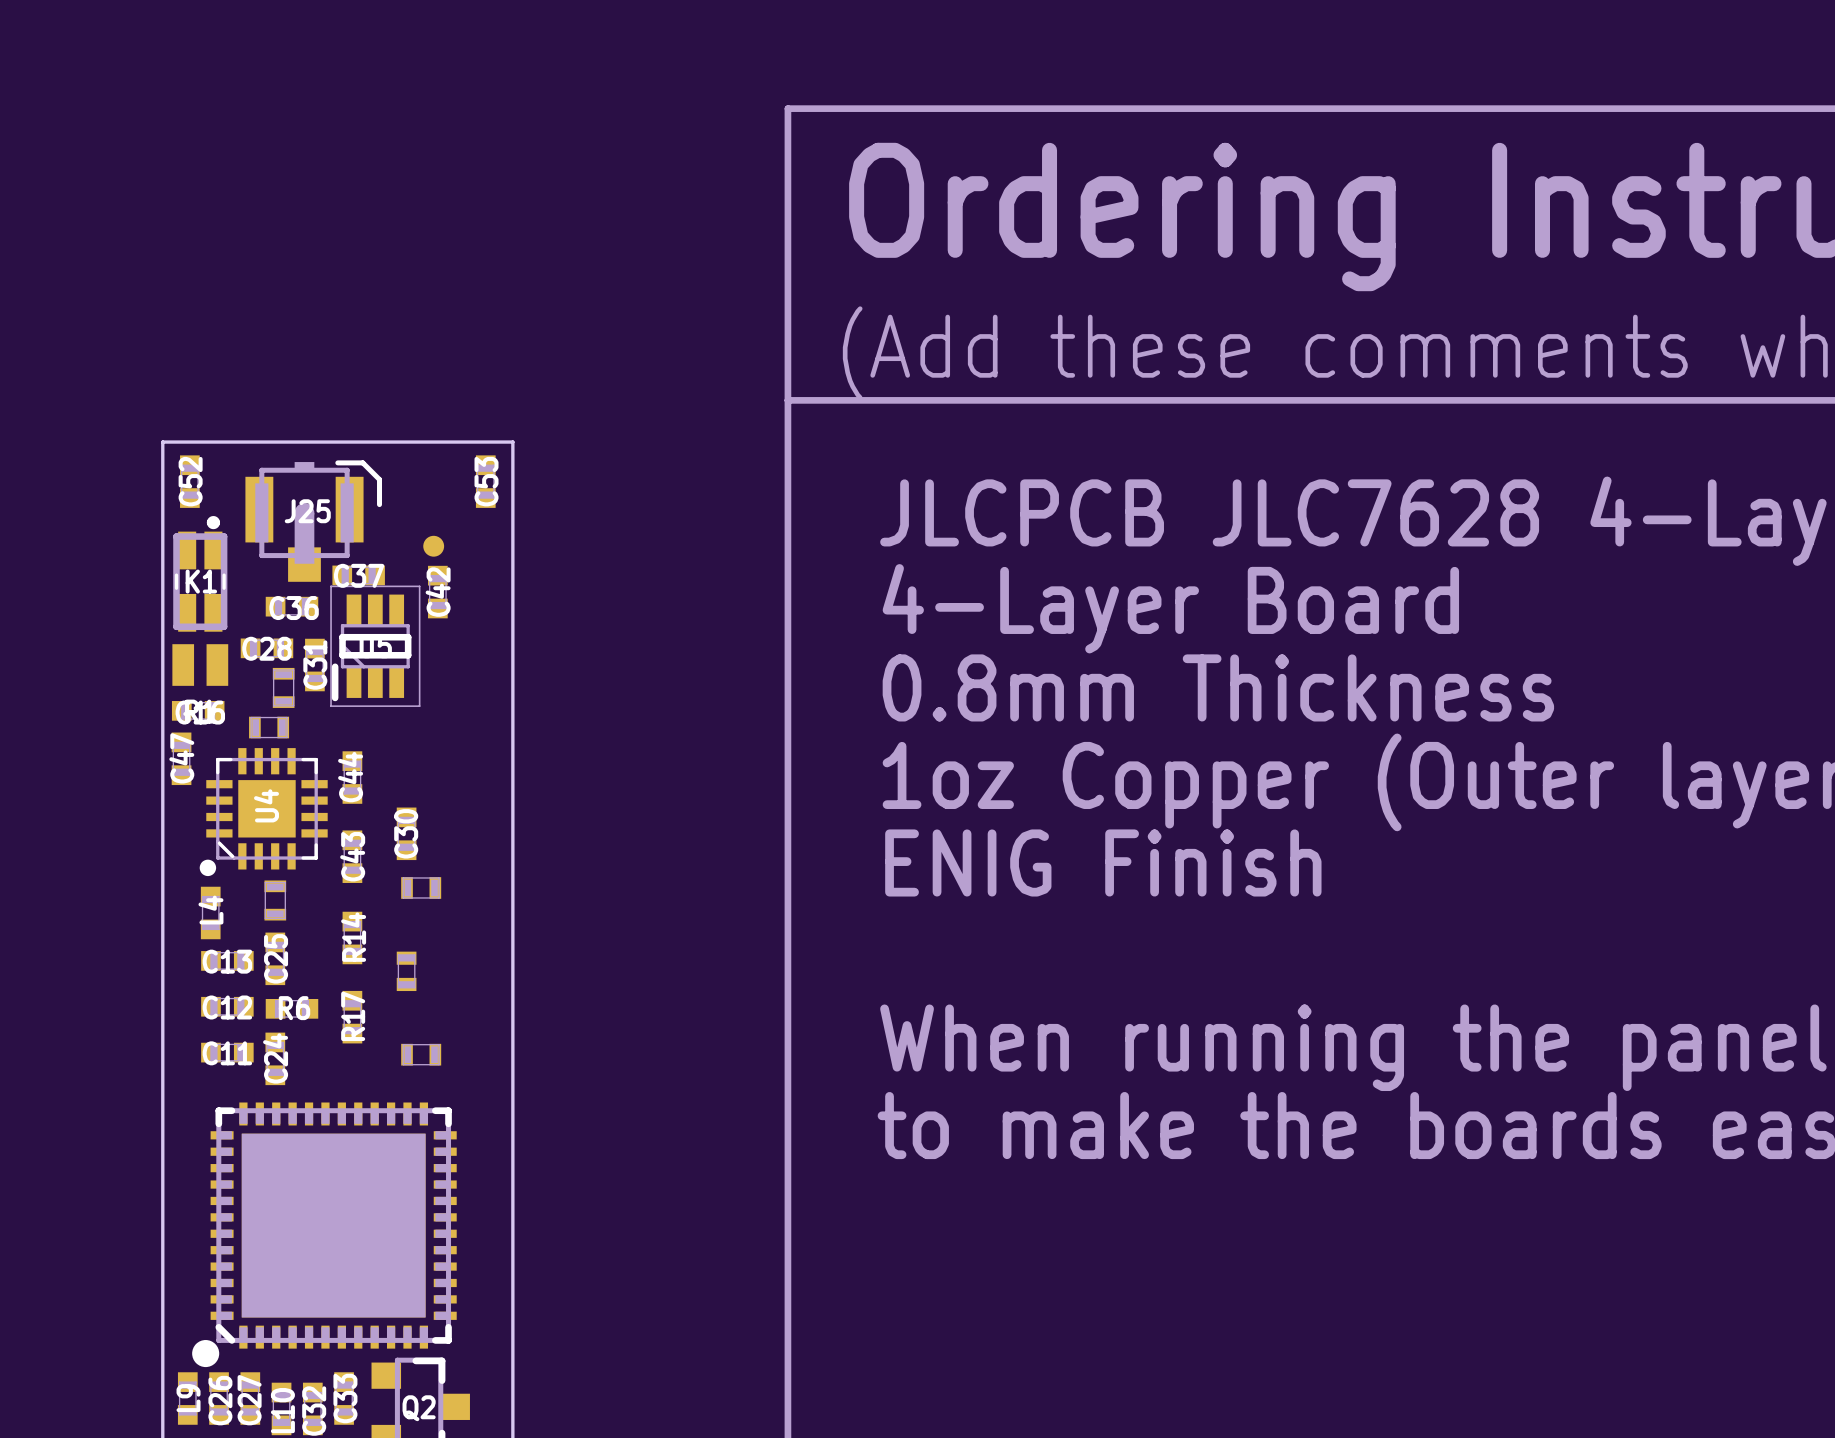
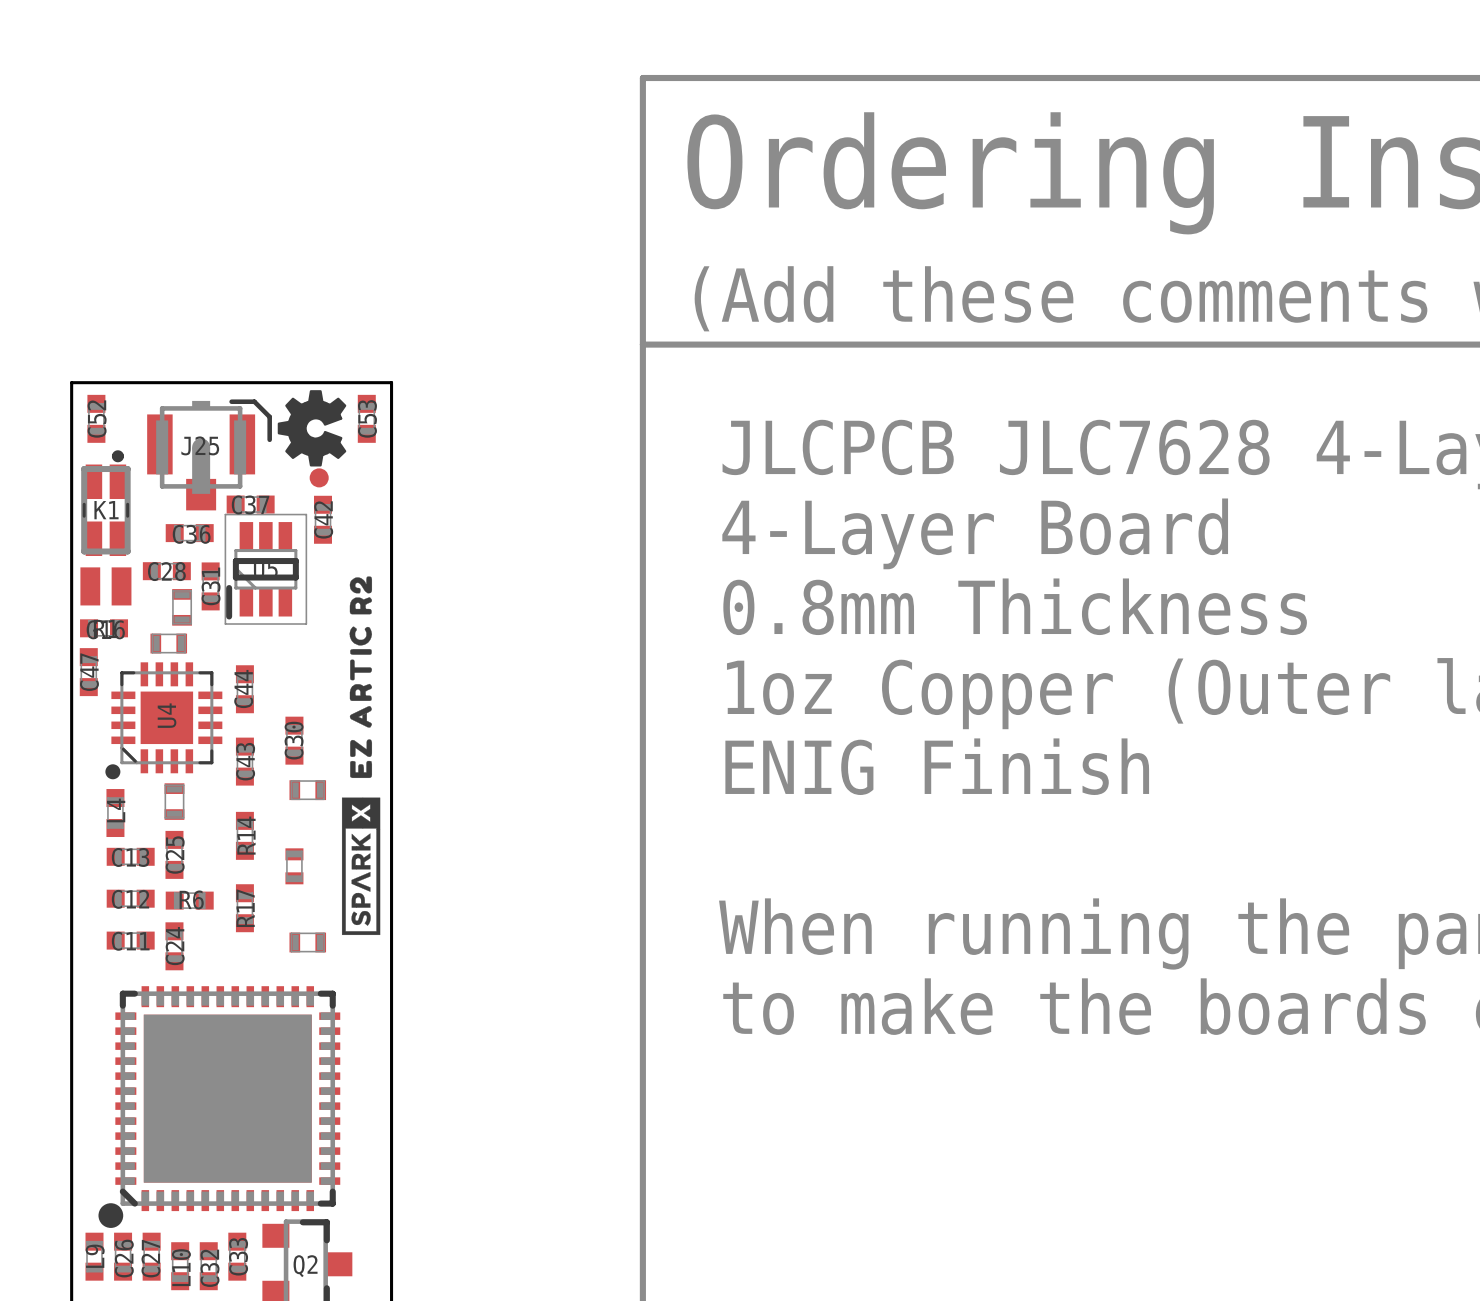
drawing: none -> [277, 390, 347, 467]
drawing: none -> [341, 576, 381, 936]

